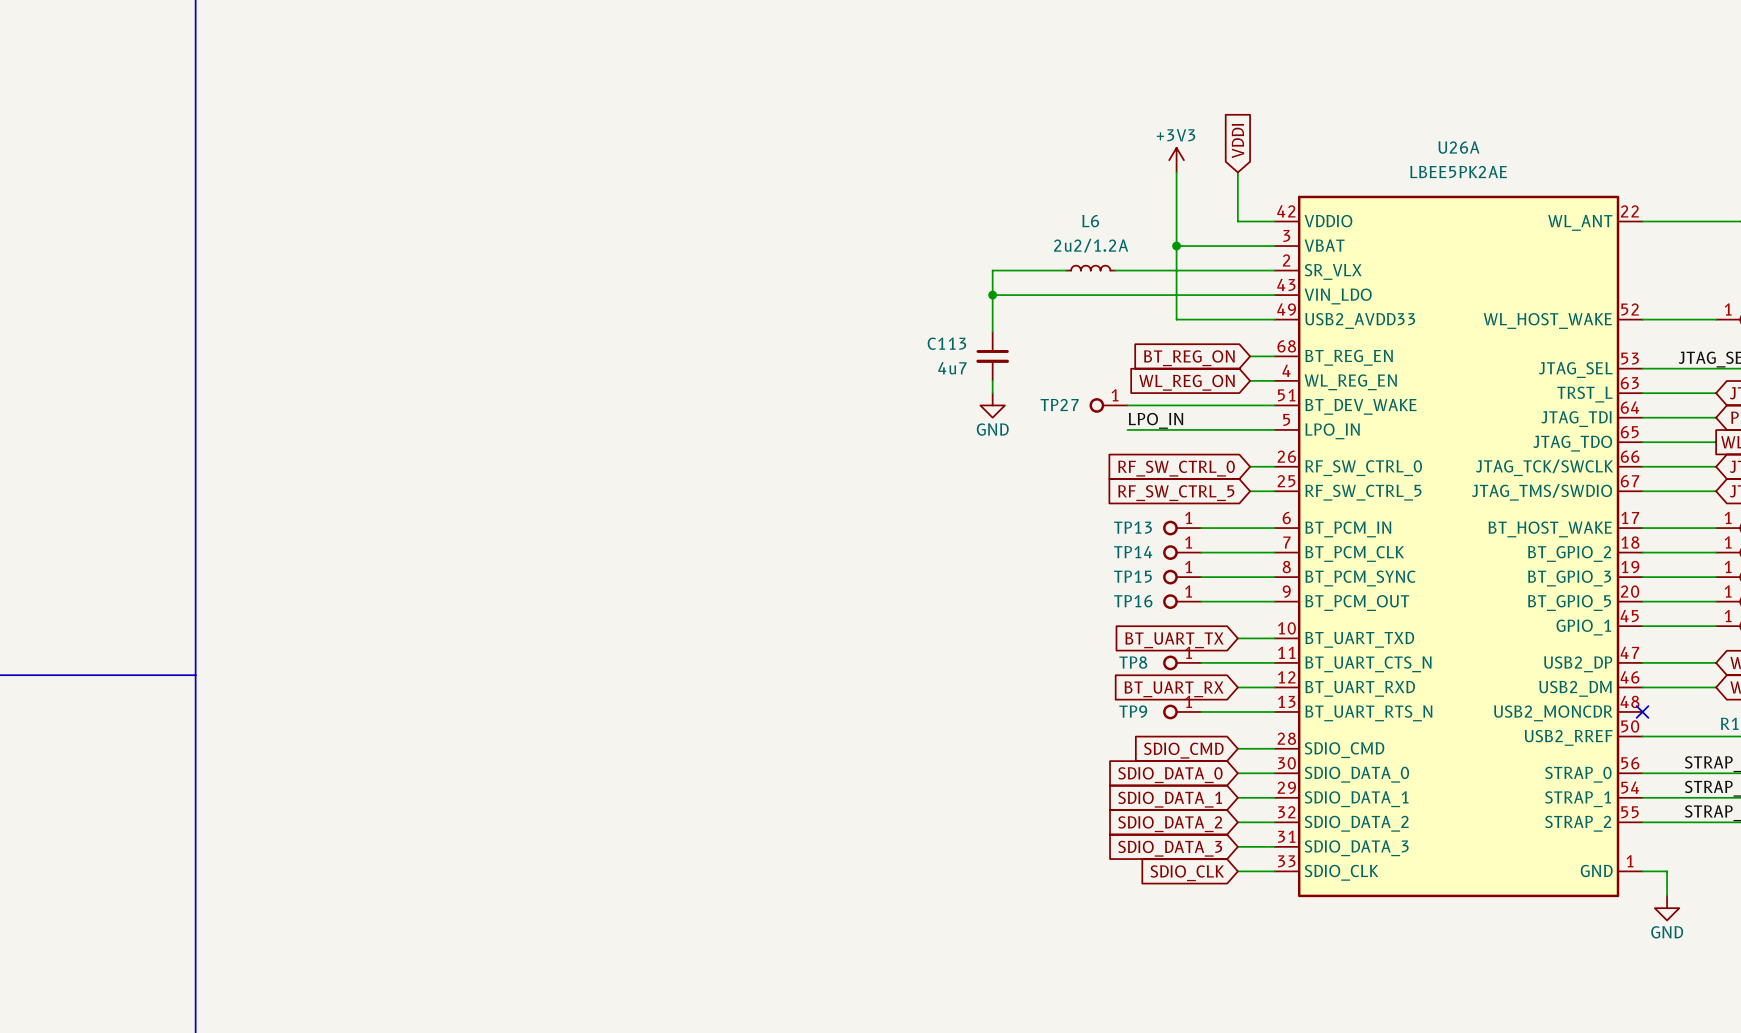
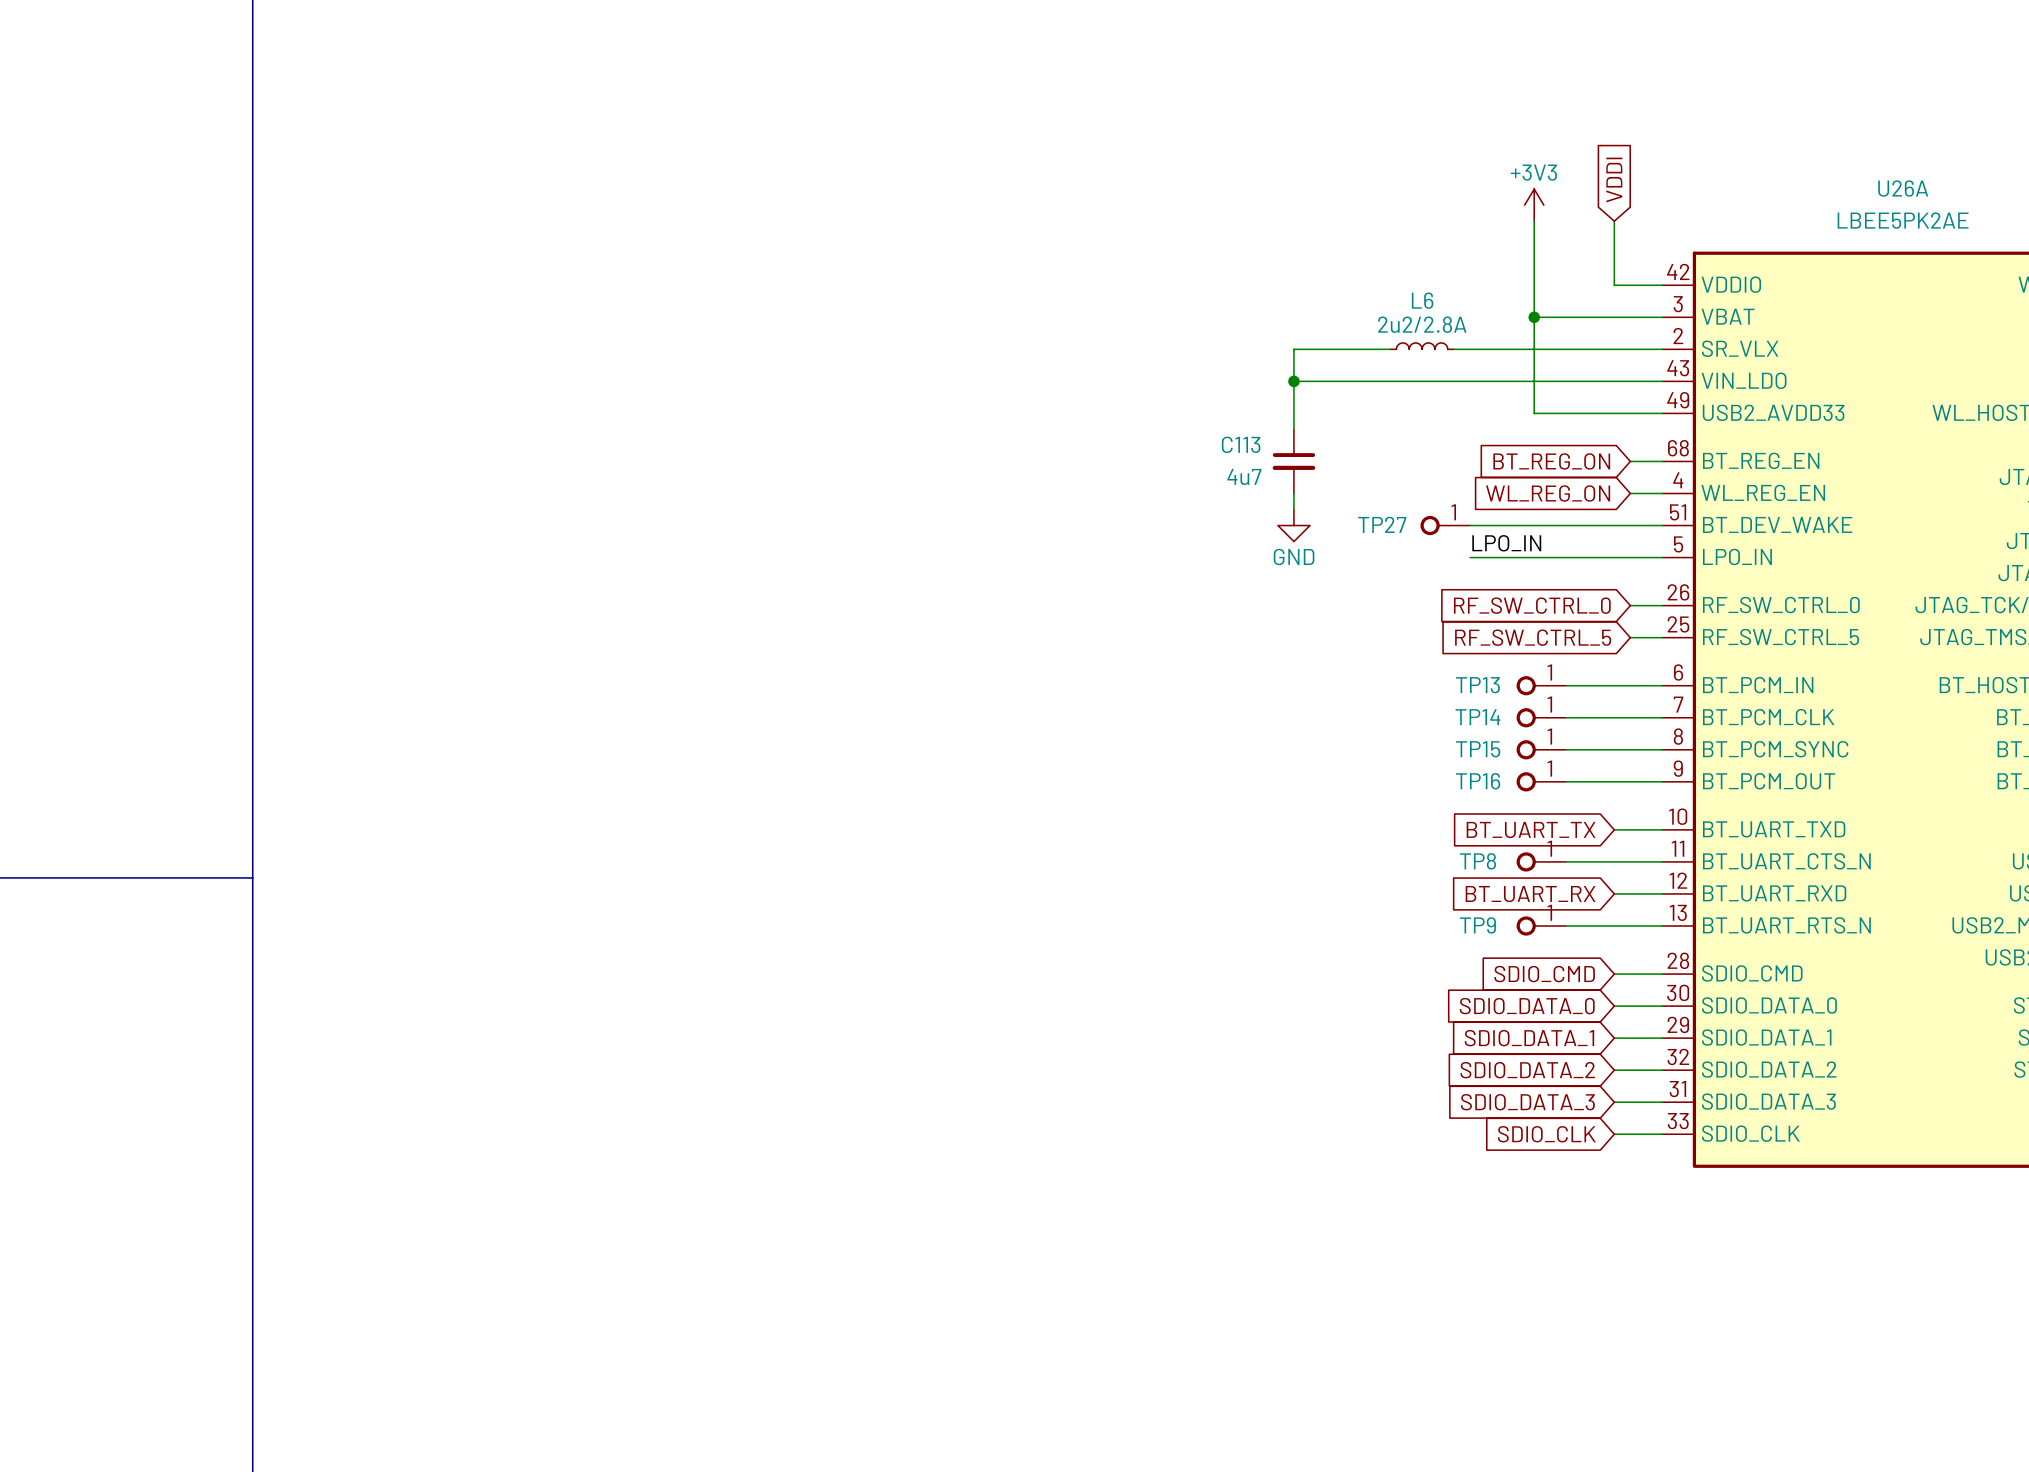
L6 name position: L6 (1090, 221) -> L6 (1422, 300)
L6 text: 2u2/1.2A (1091, 245) -> 2u2/2.8A (1422, 324)

